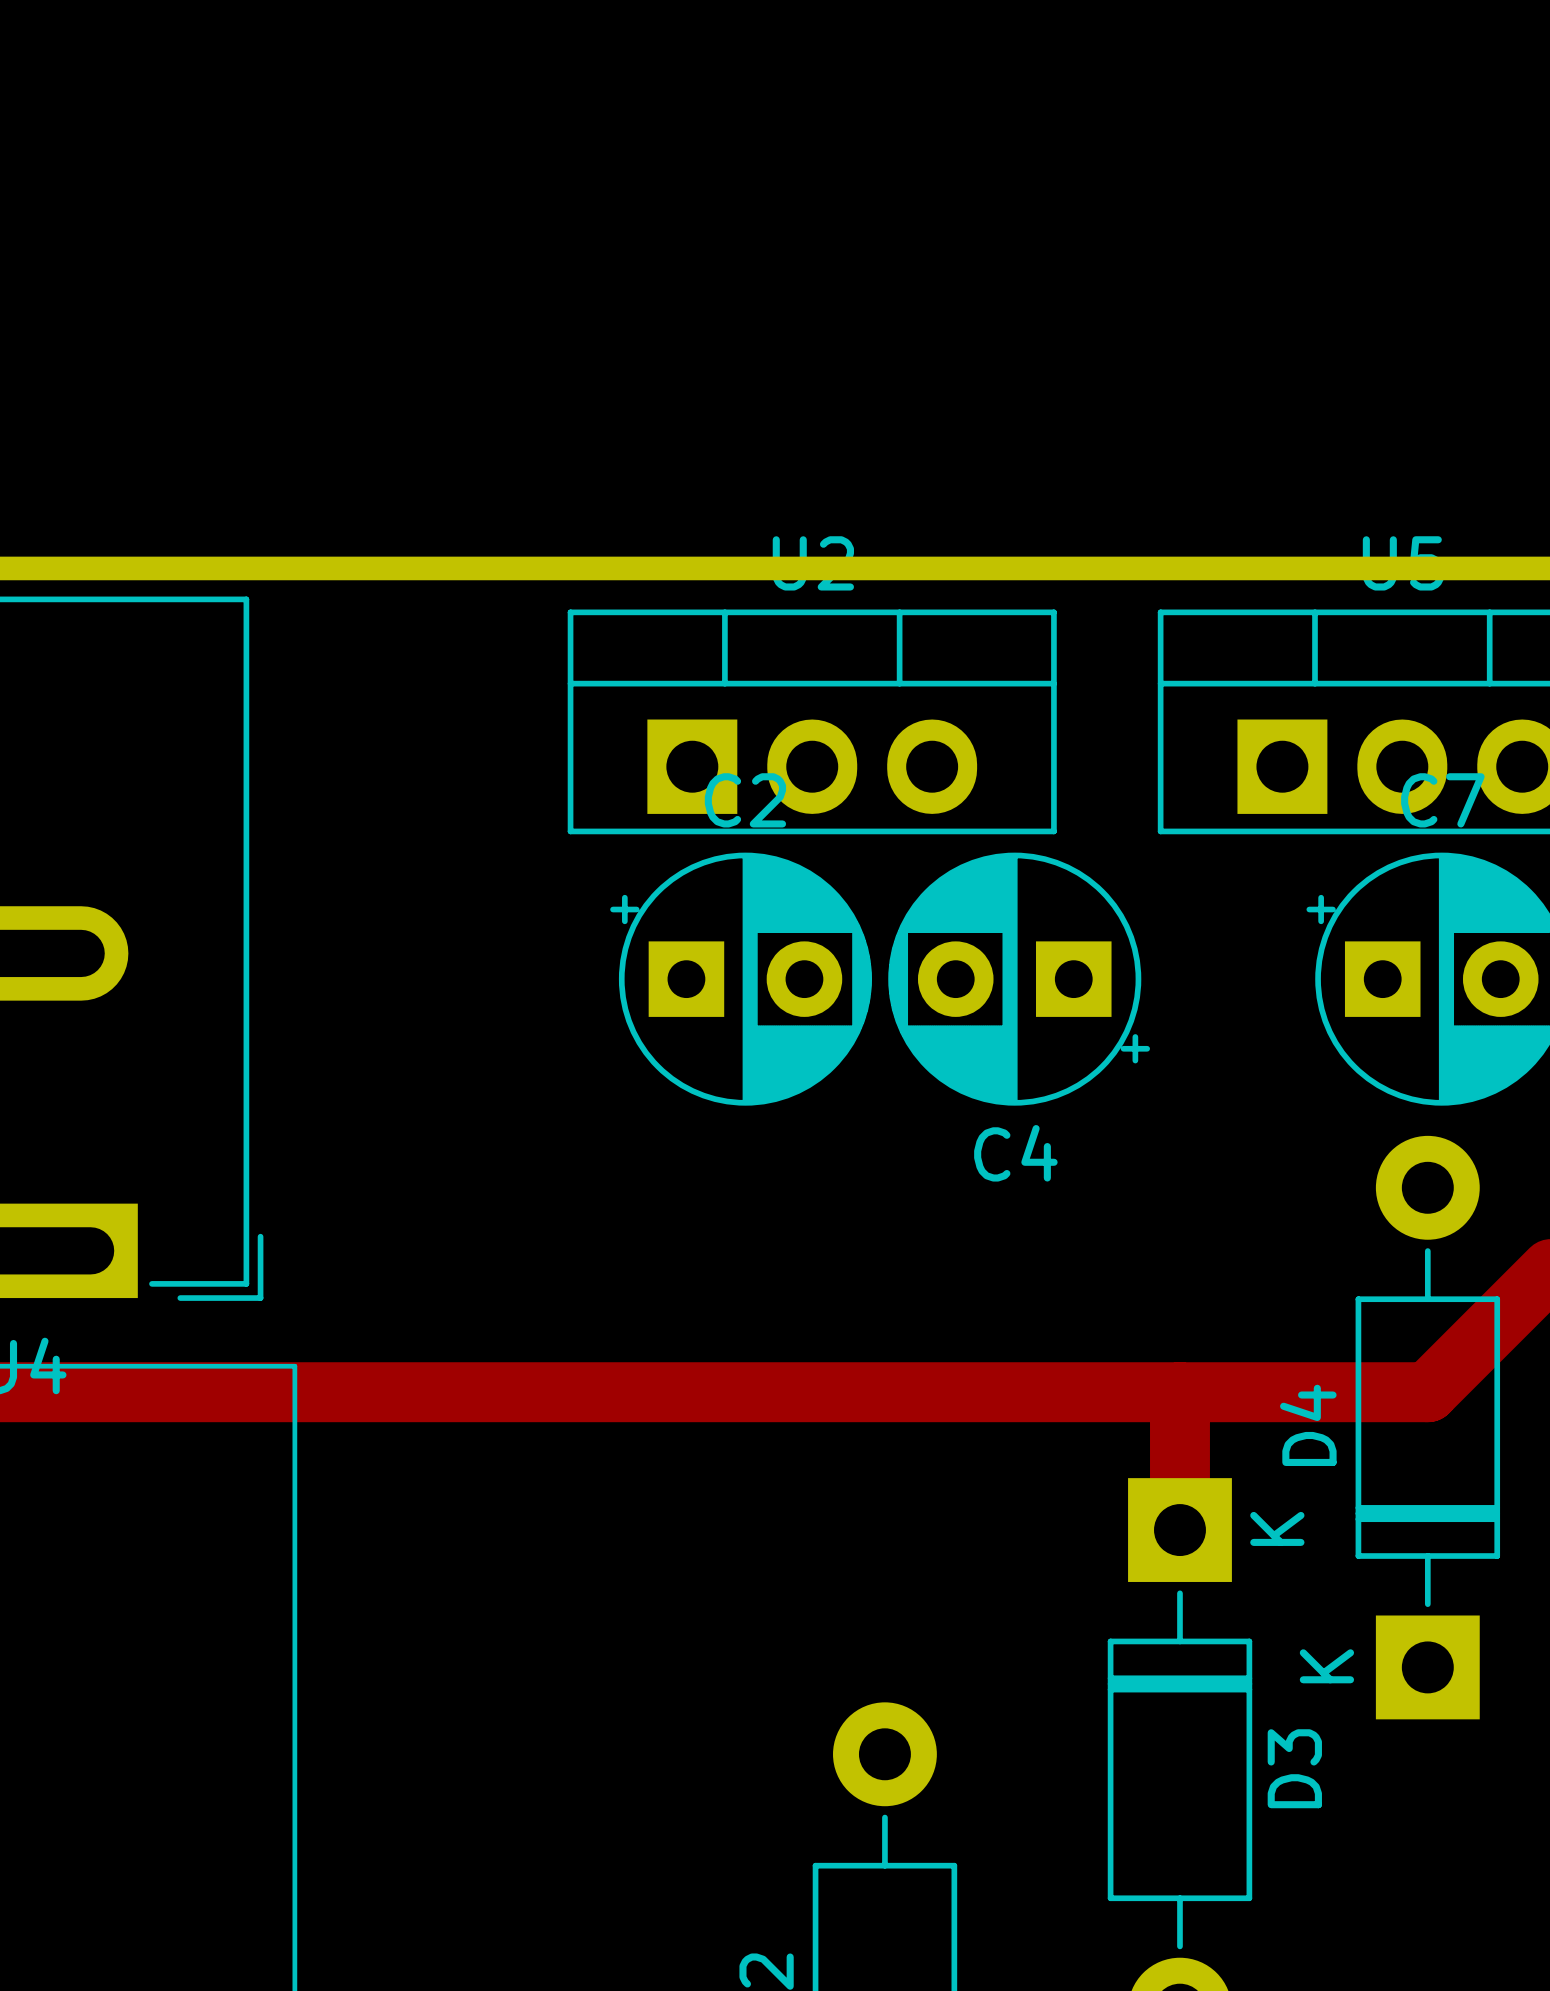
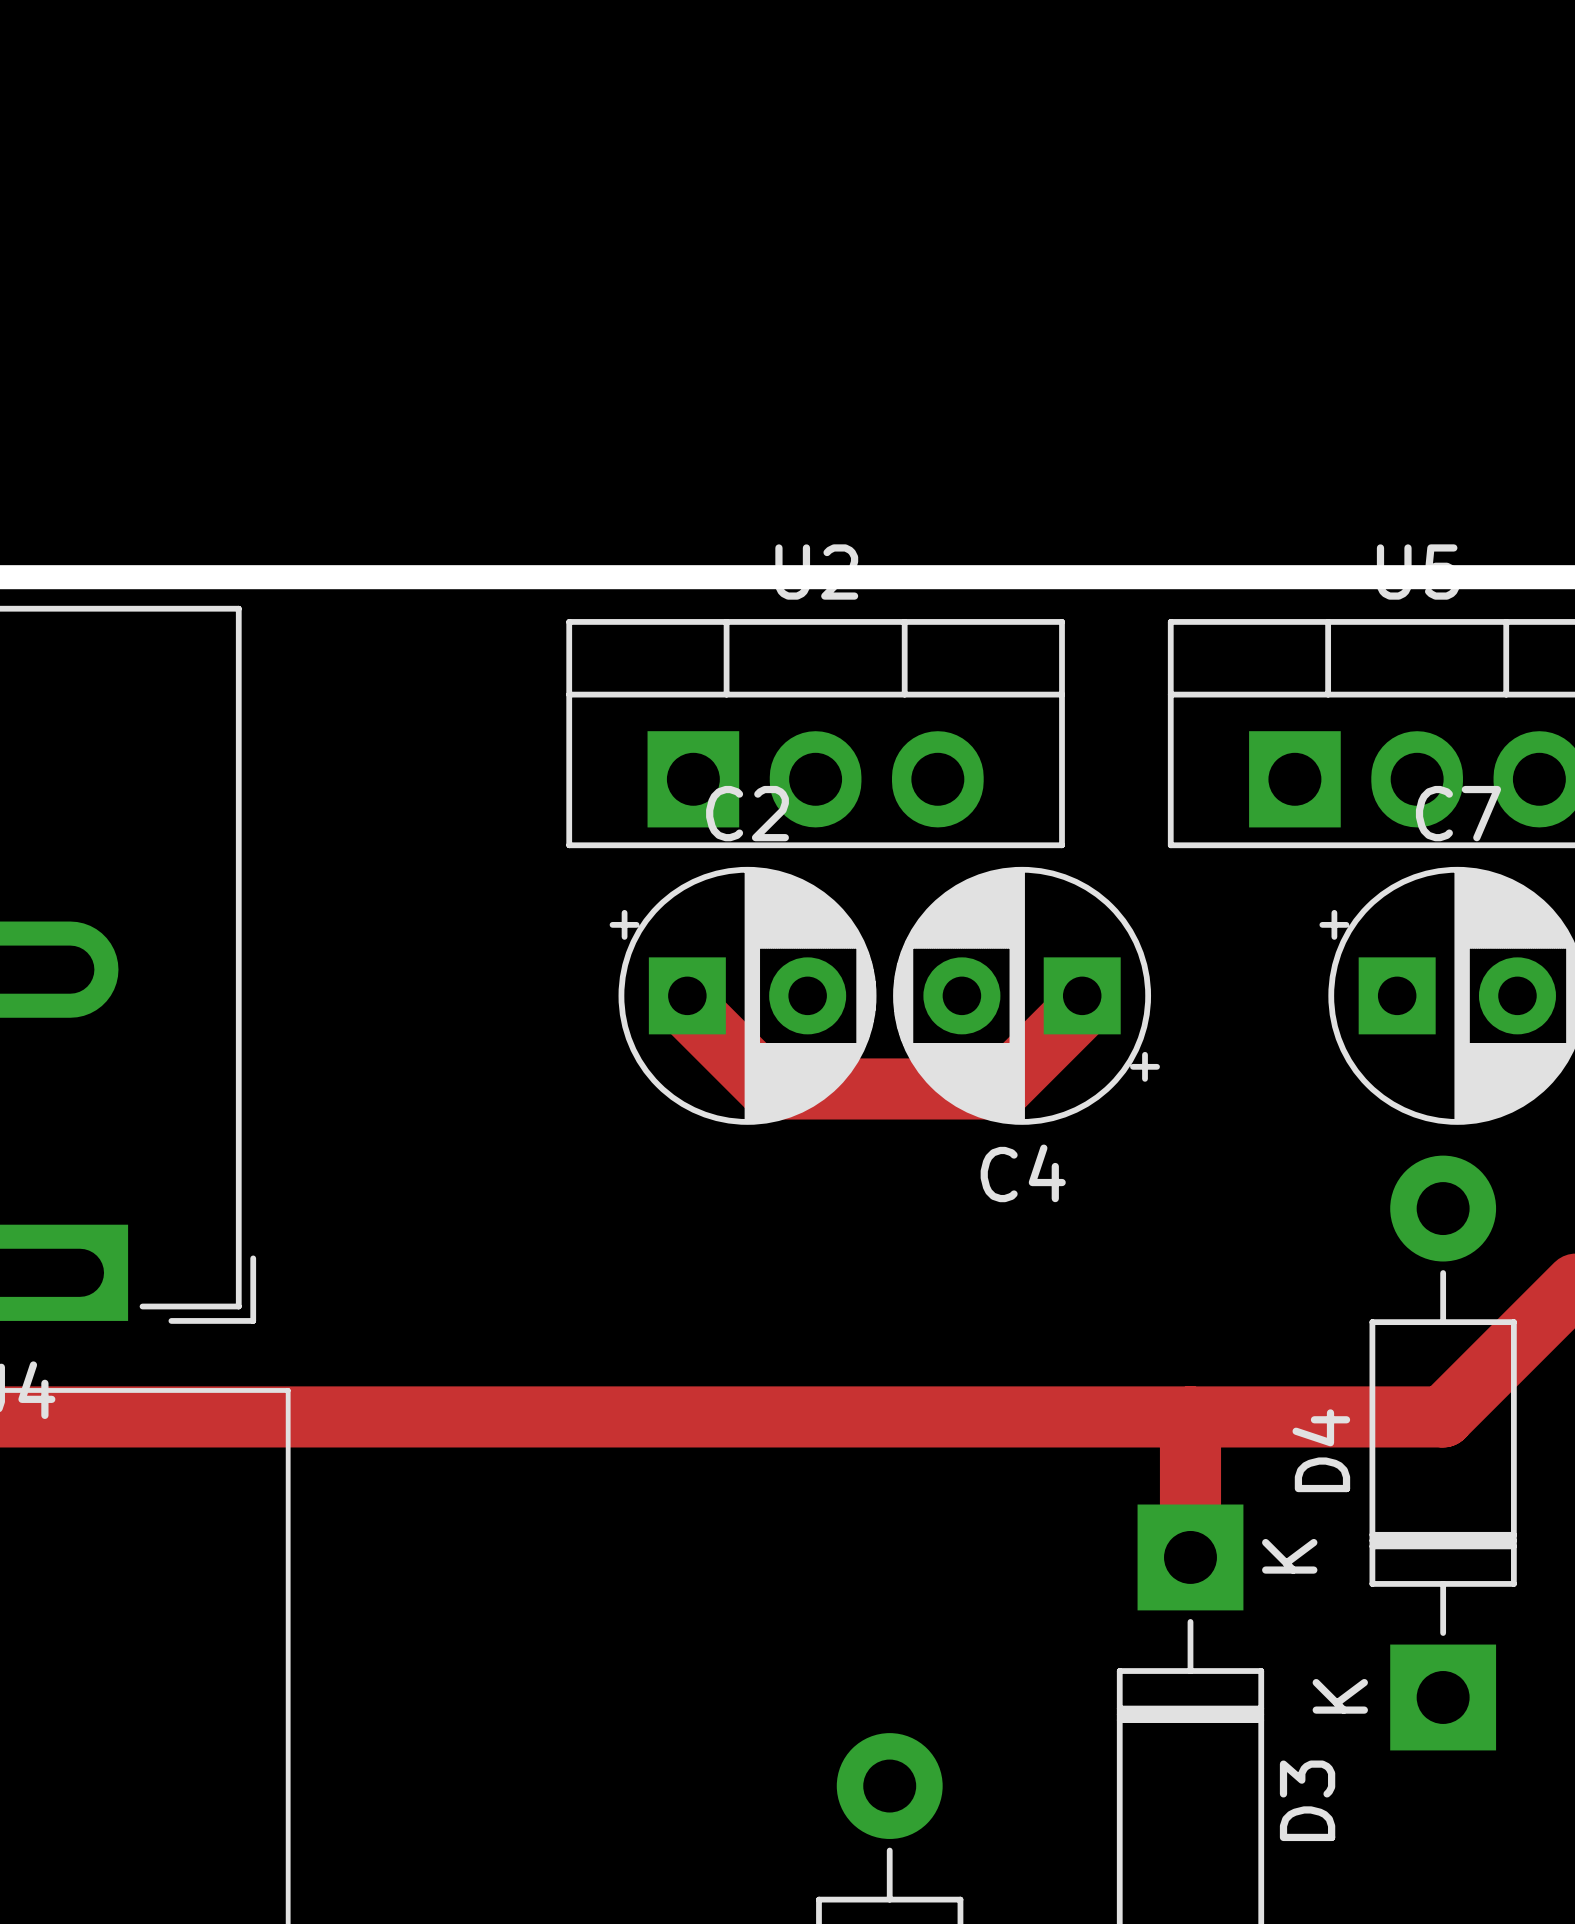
track: none -> (687, 995) (687, 1007) (769, 1088) (1000, 1088) (1082, 1007)

